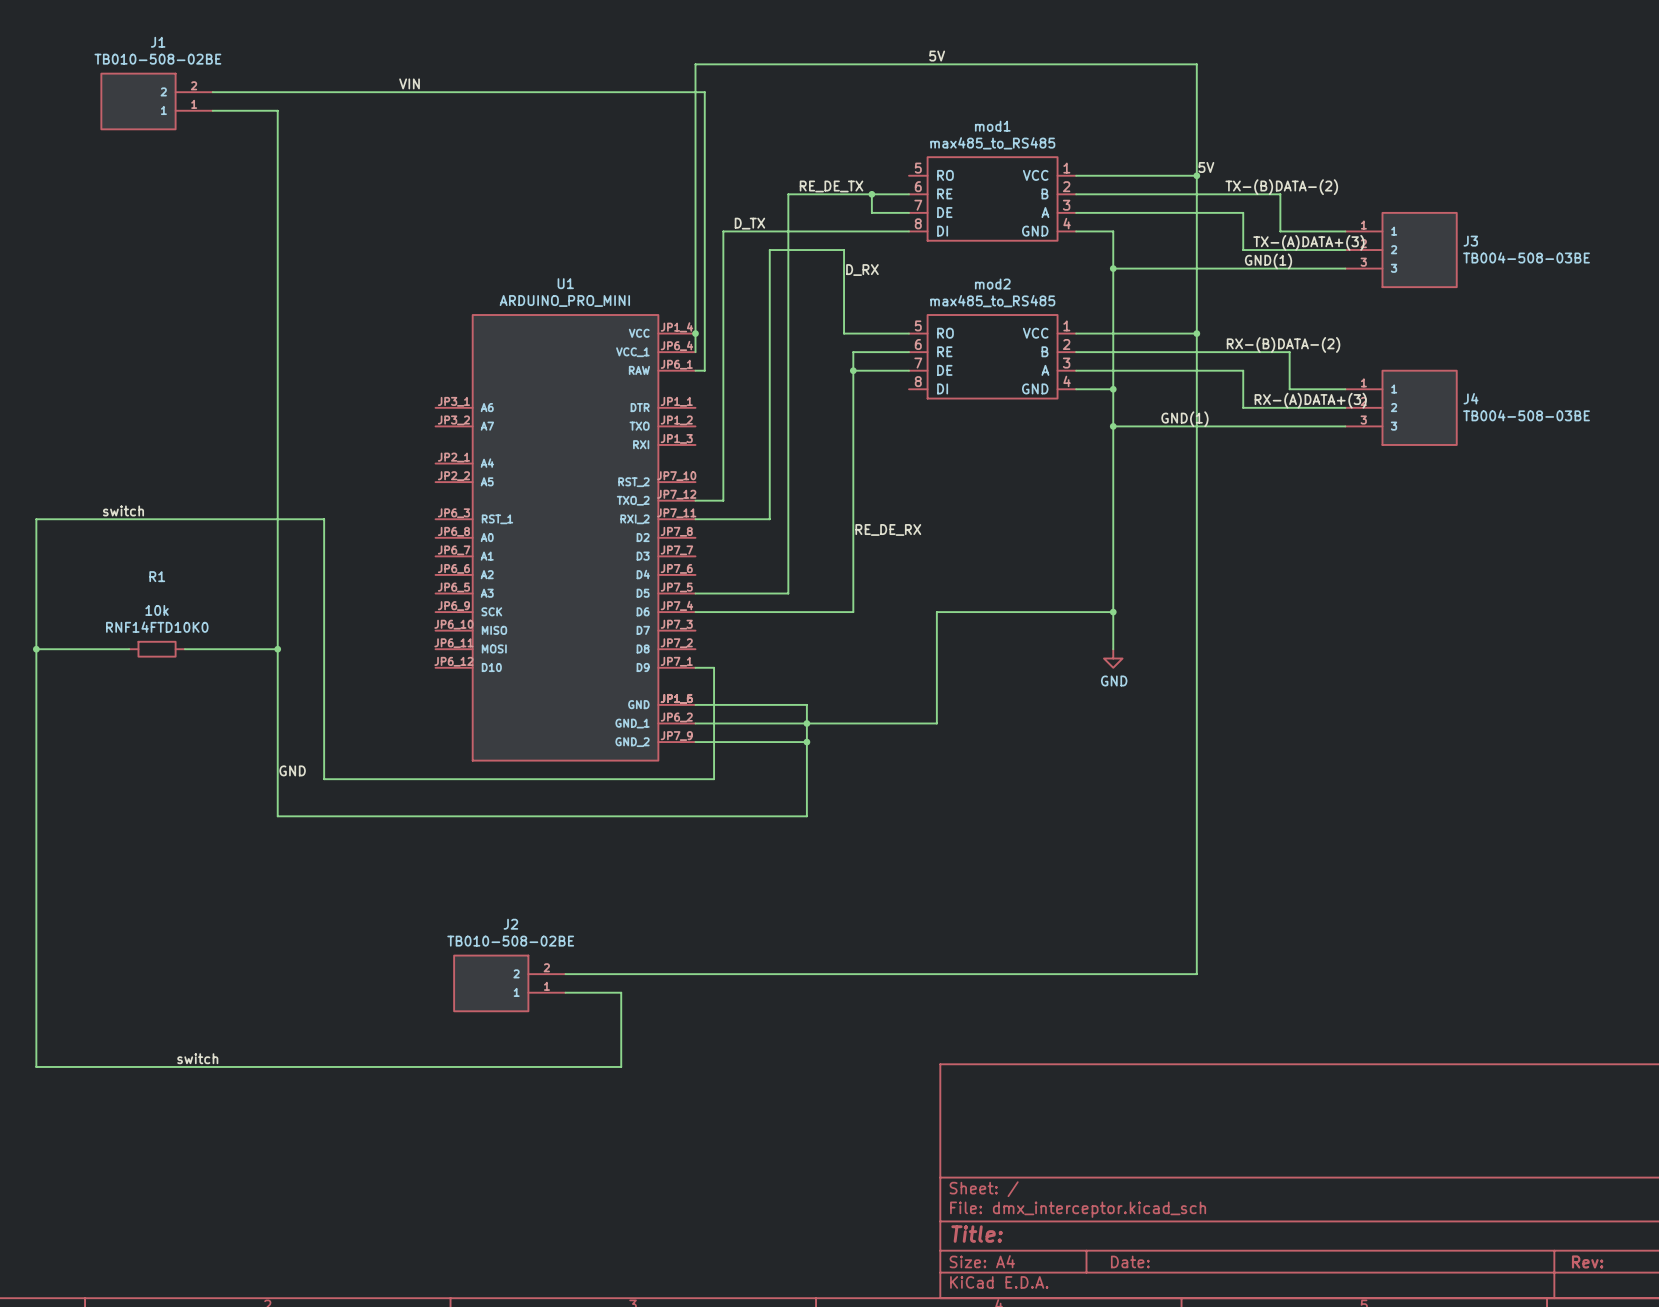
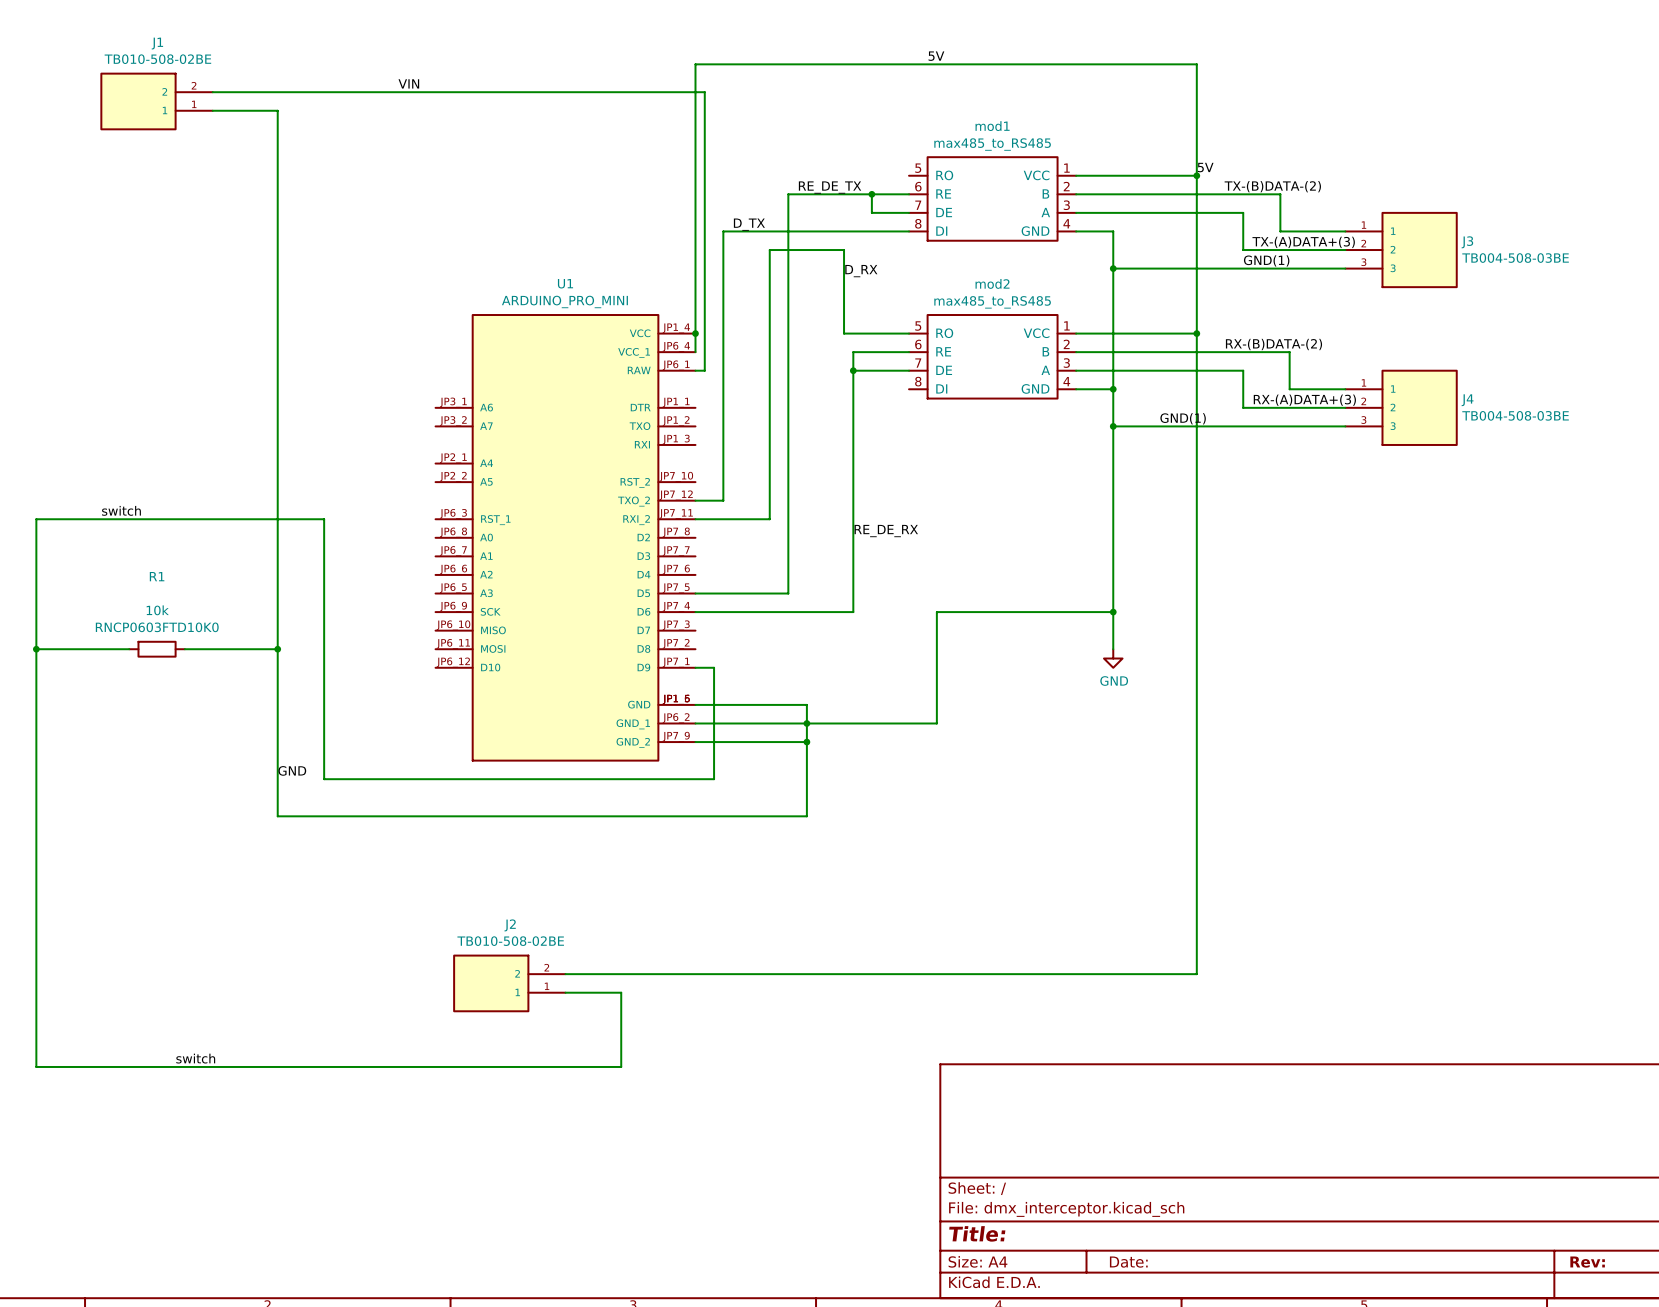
R1 text: RNF14FTD10K0 (157, 627) -> RNCP0603FTD10K0 (157, 627)

